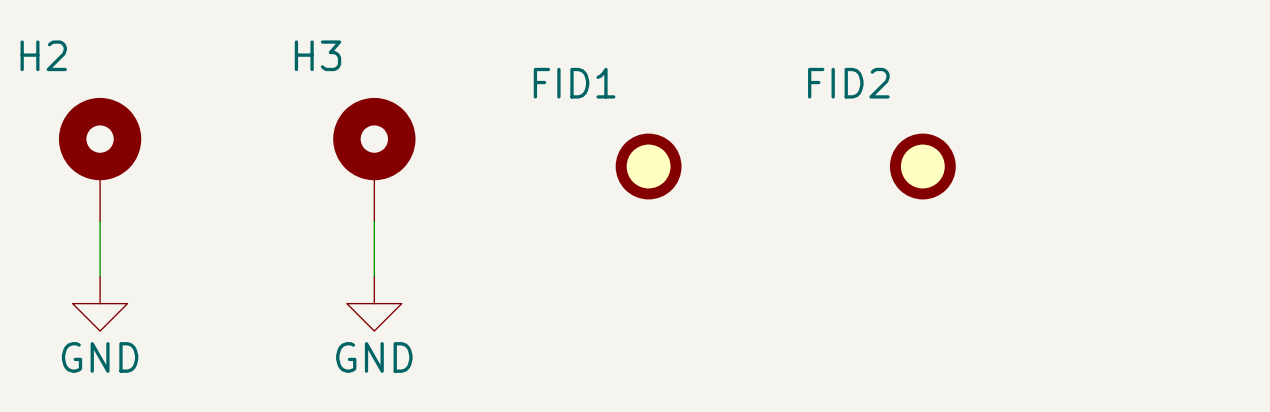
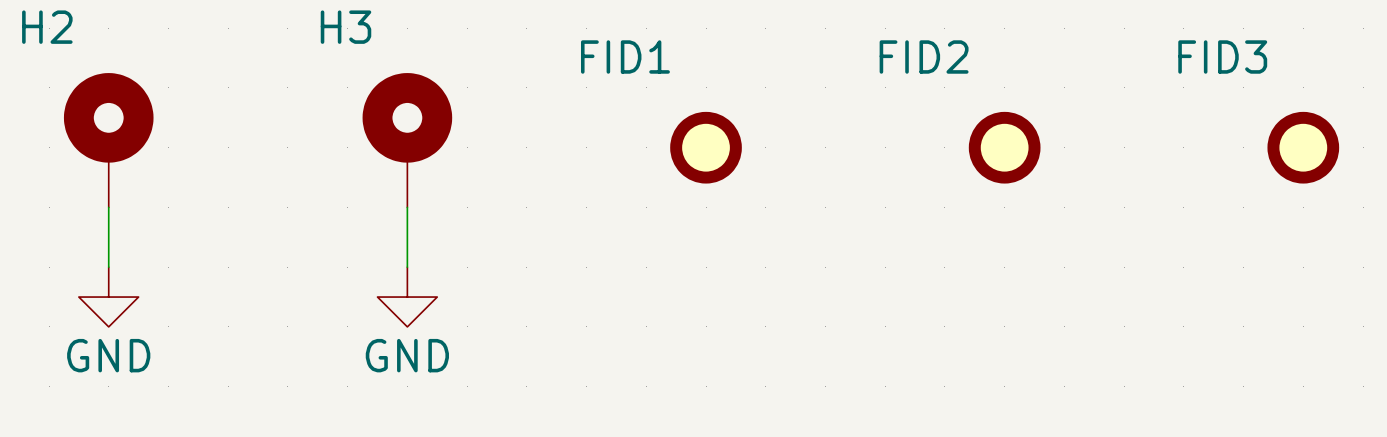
FID3: none -> (1303, 147)

